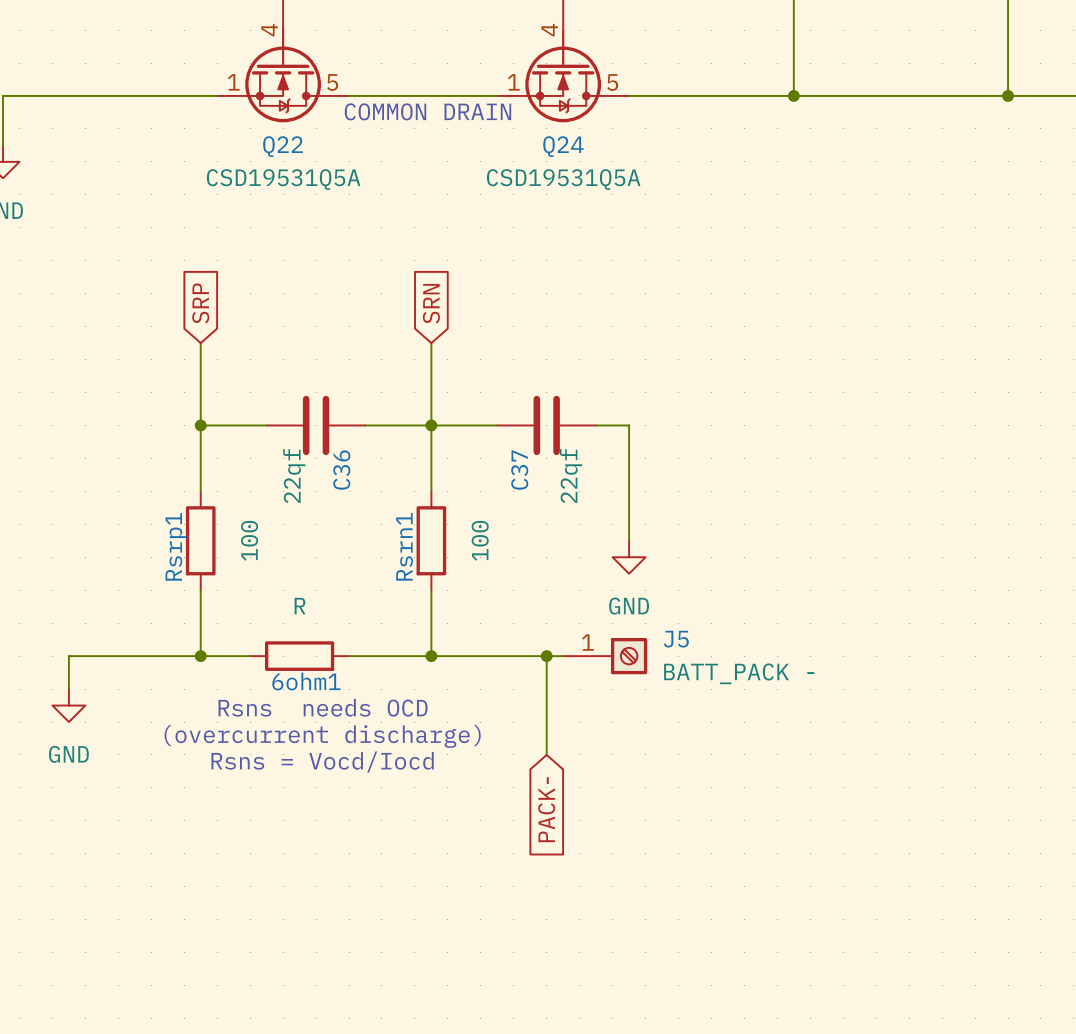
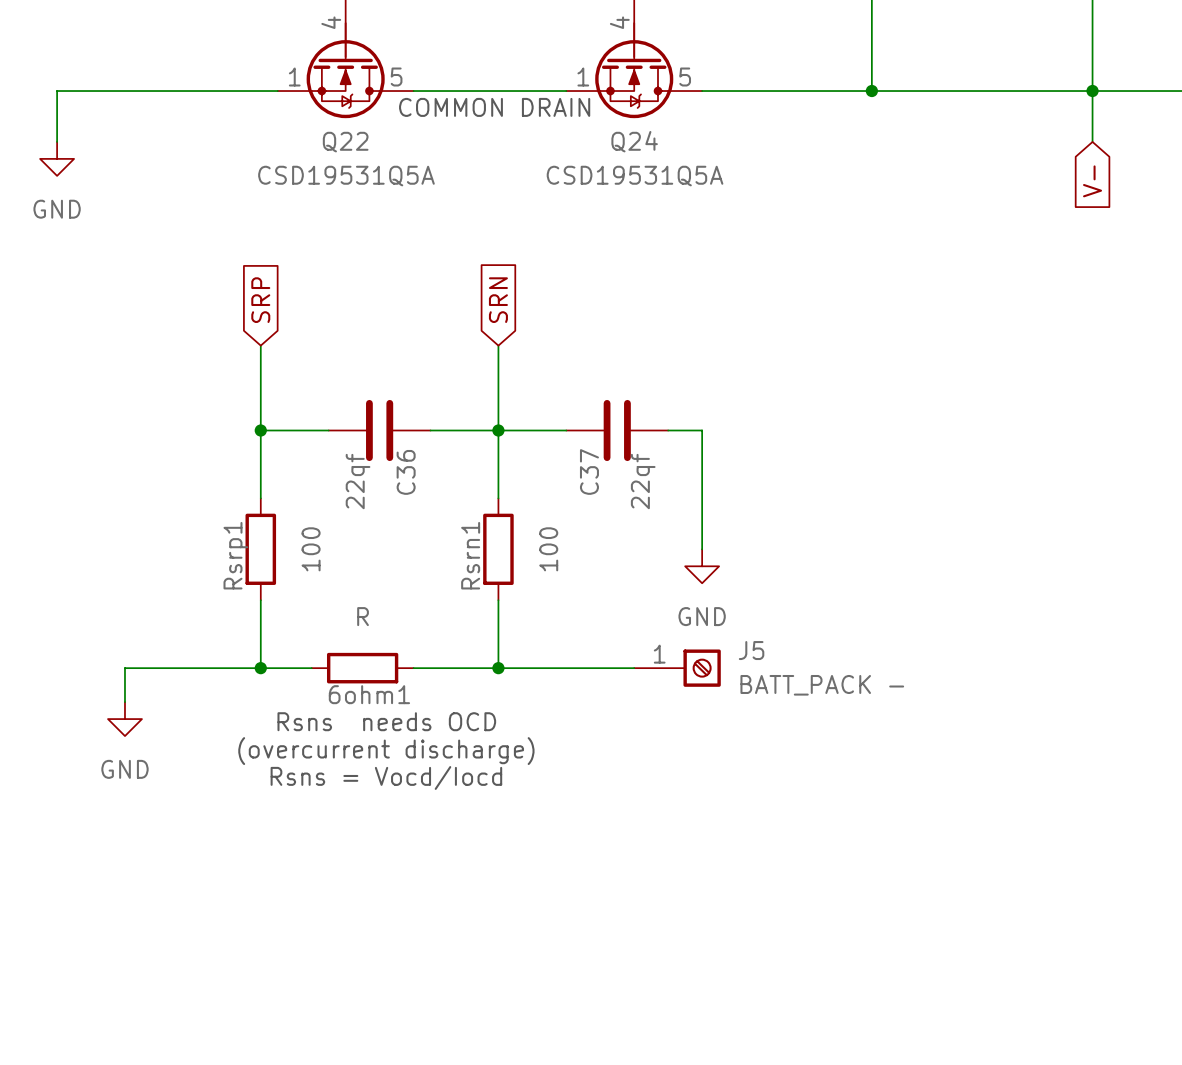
wire: none -> (1092, 91) (1092, 141)
global label: none -> V- (1092, 181)
wire: (546, 656) (546, 754) -> none
junction: (546, 656) -> none
global label: PACK- (546, 809) -> none

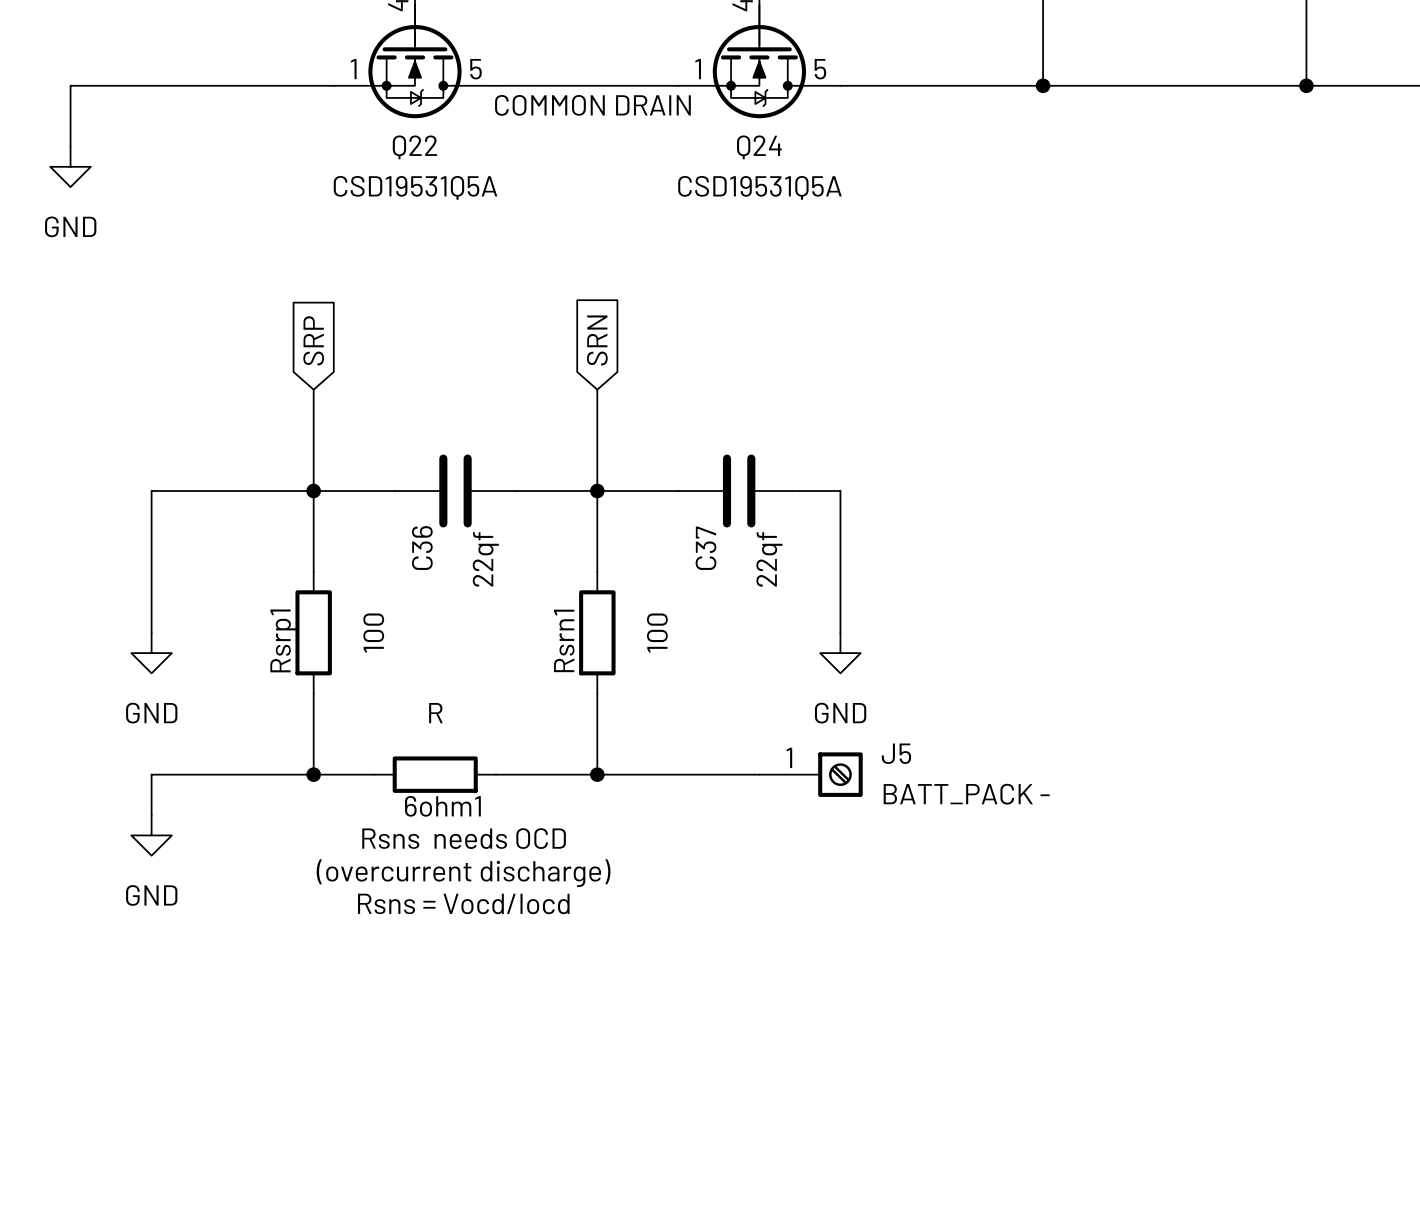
wire: (1092, 91) (1092, 141) -> none
global label: V- (1092, 181) -> none
wire: none -> (313, 491) (151, 491) (151, 632)
C36 name position: C36 (406, 472) -> C36 (422, 548)
C36 value position: 22qf (358, 481) -> 22qf (485, 559)
power symbol: none -> GND (151, 653)

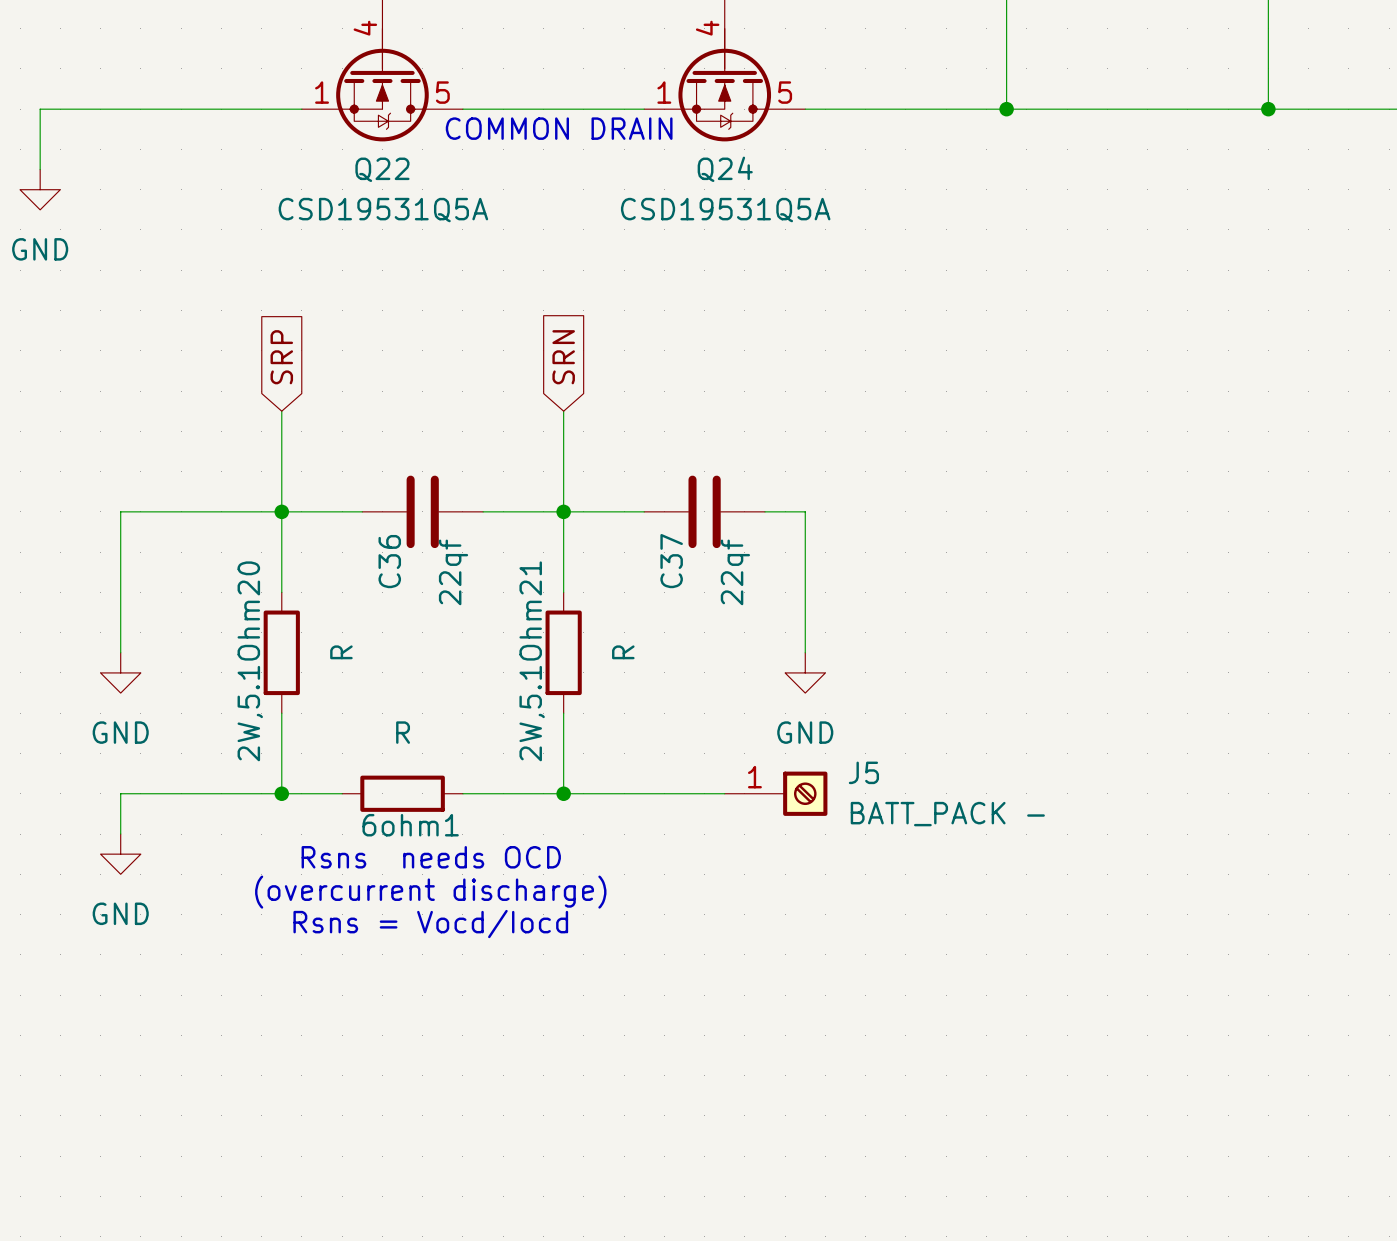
Rsrp1 value: 100 (373, 633) -> R (341, 652)
Rsrn1 value: 100 (657, 633) -> R (623, 652)
Rsrp1 name: Rsrp1 (283, 640) -> 2W,5.1Ohm20 (250, 661)
Rsrn1 name: Rsrn1 (564, 640) -> 2W,5.1Ohm21 (532, 661)

